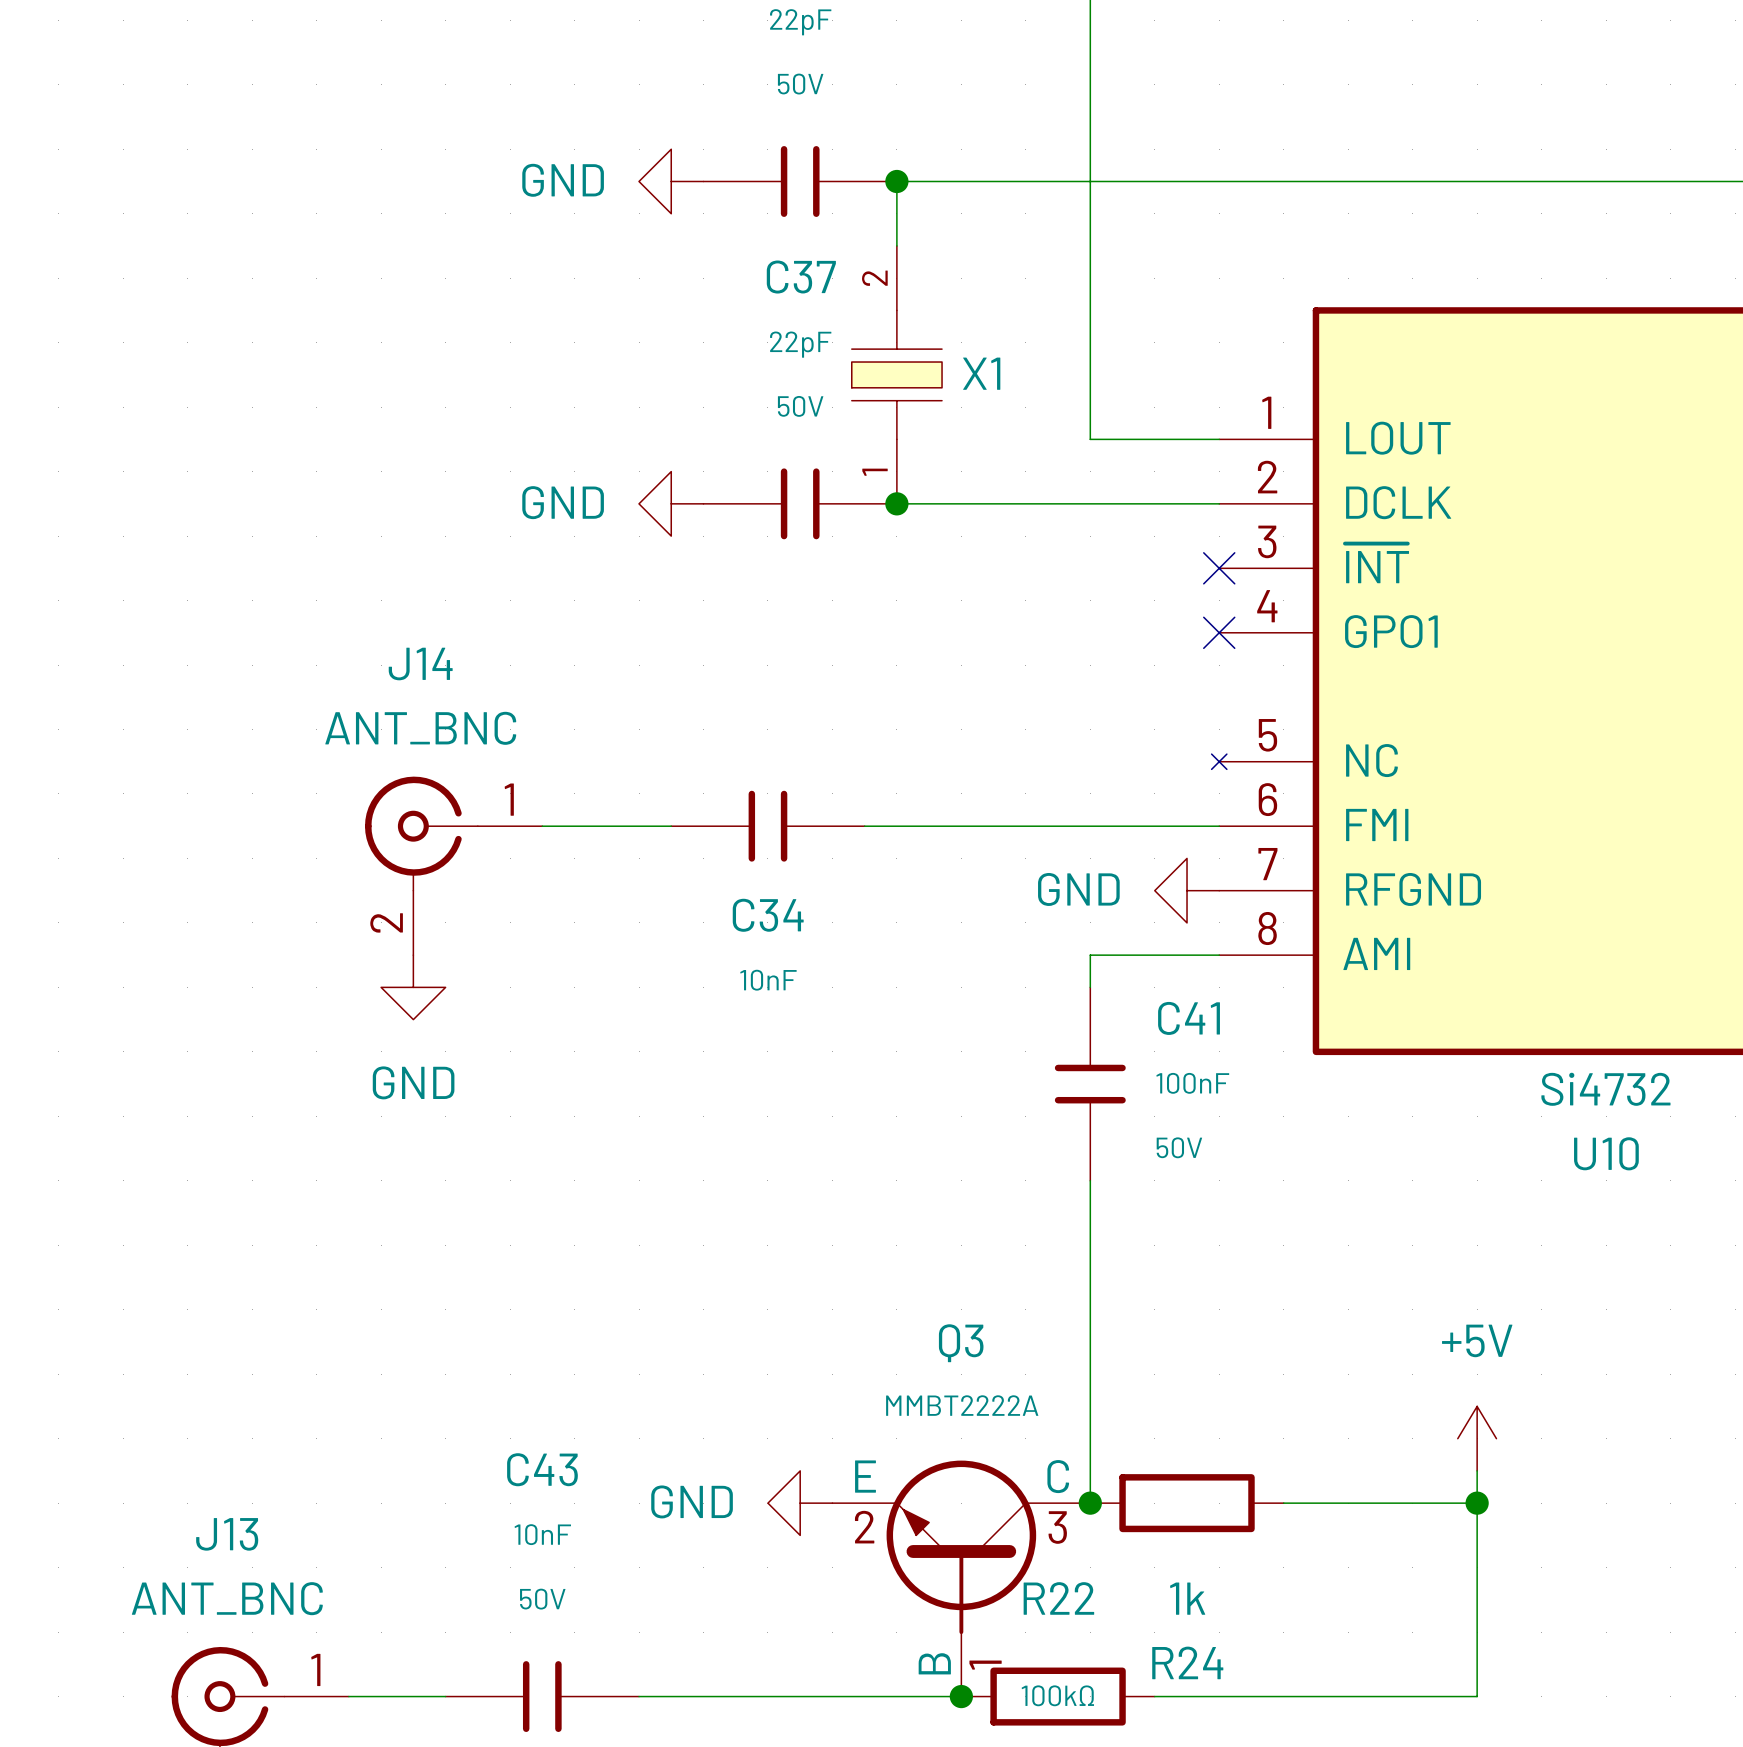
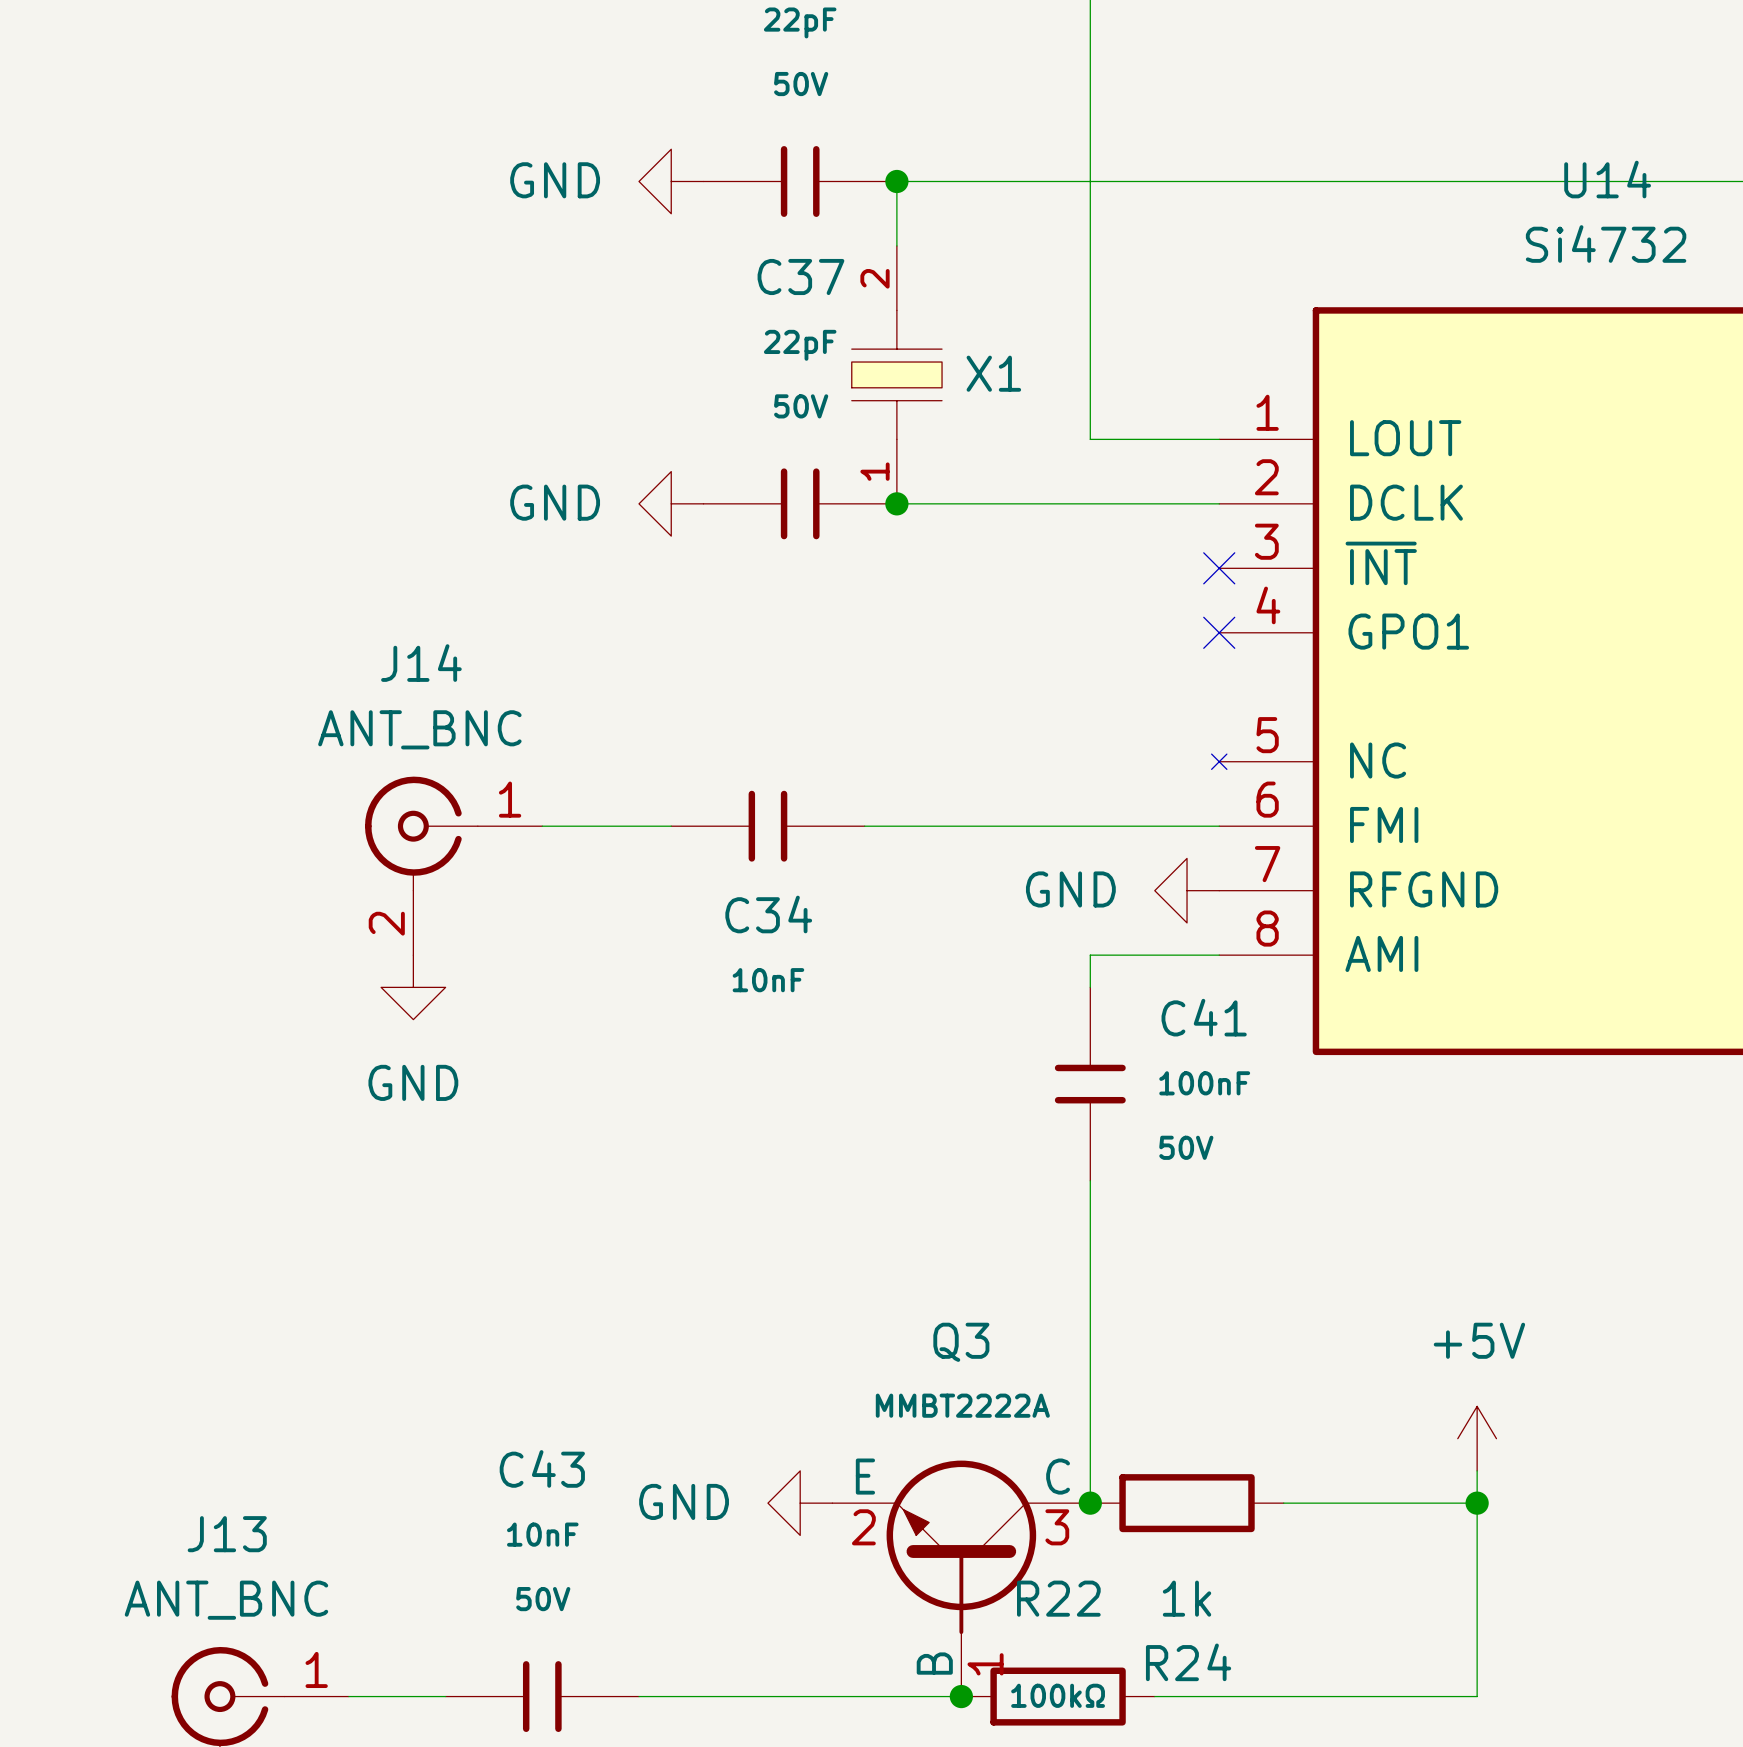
U10 value position: Si4732 (1605, 1089) -> Si4732 (1606, 243)
U10 name: U10 (1606, 1153) -> U14 (1607, 179)

